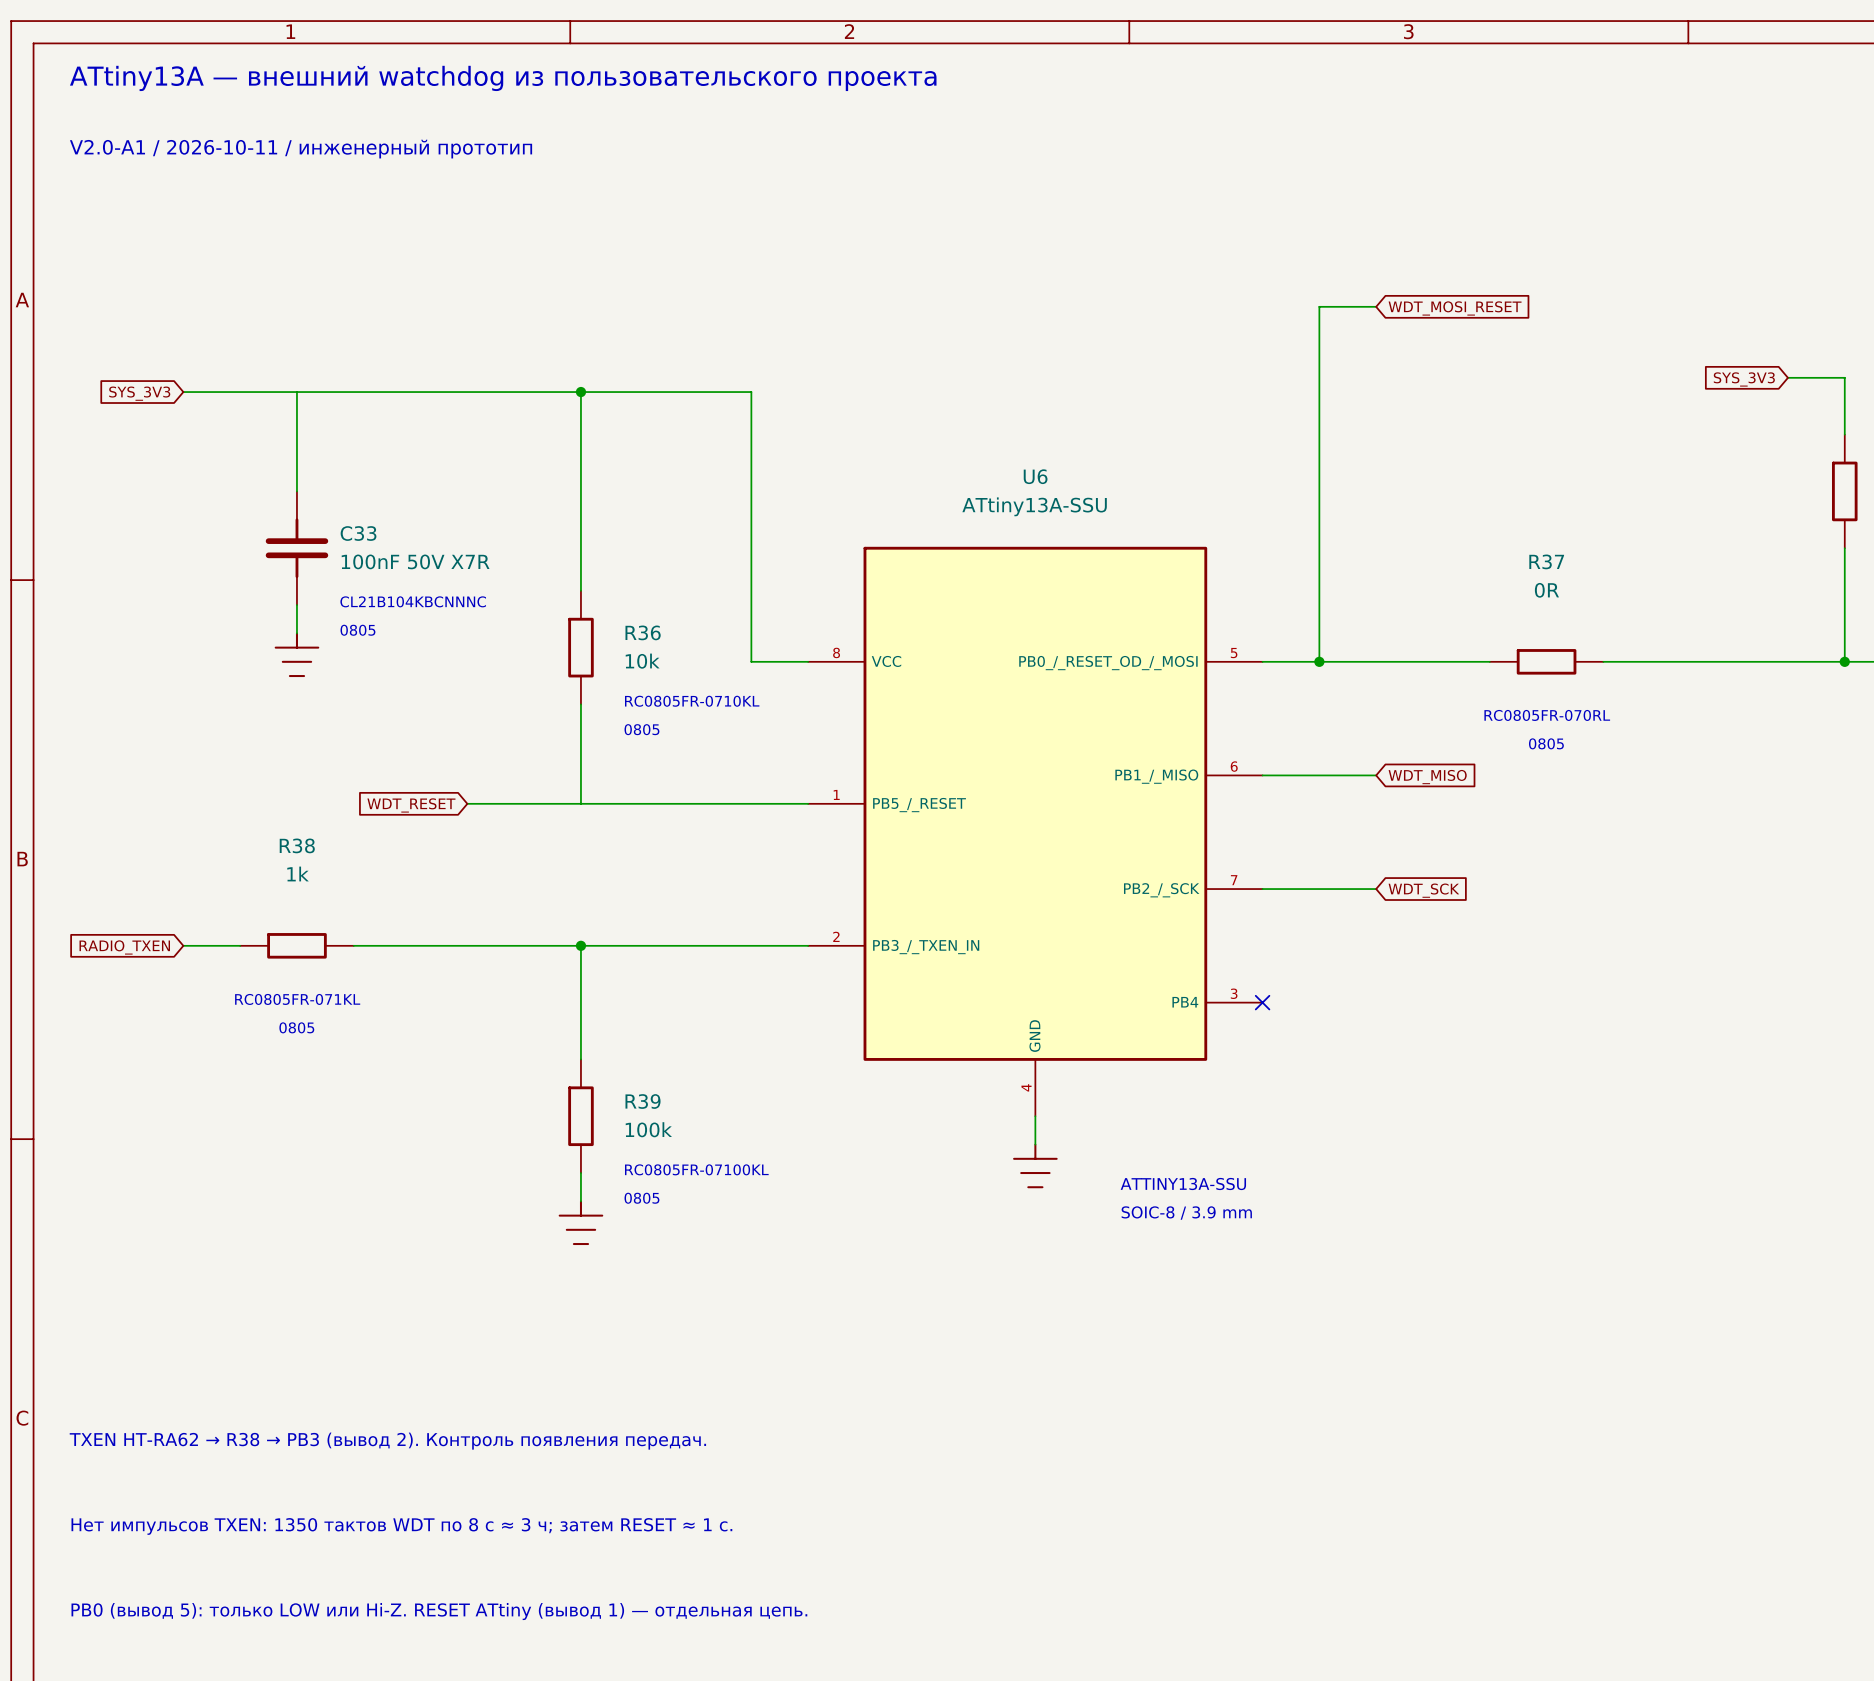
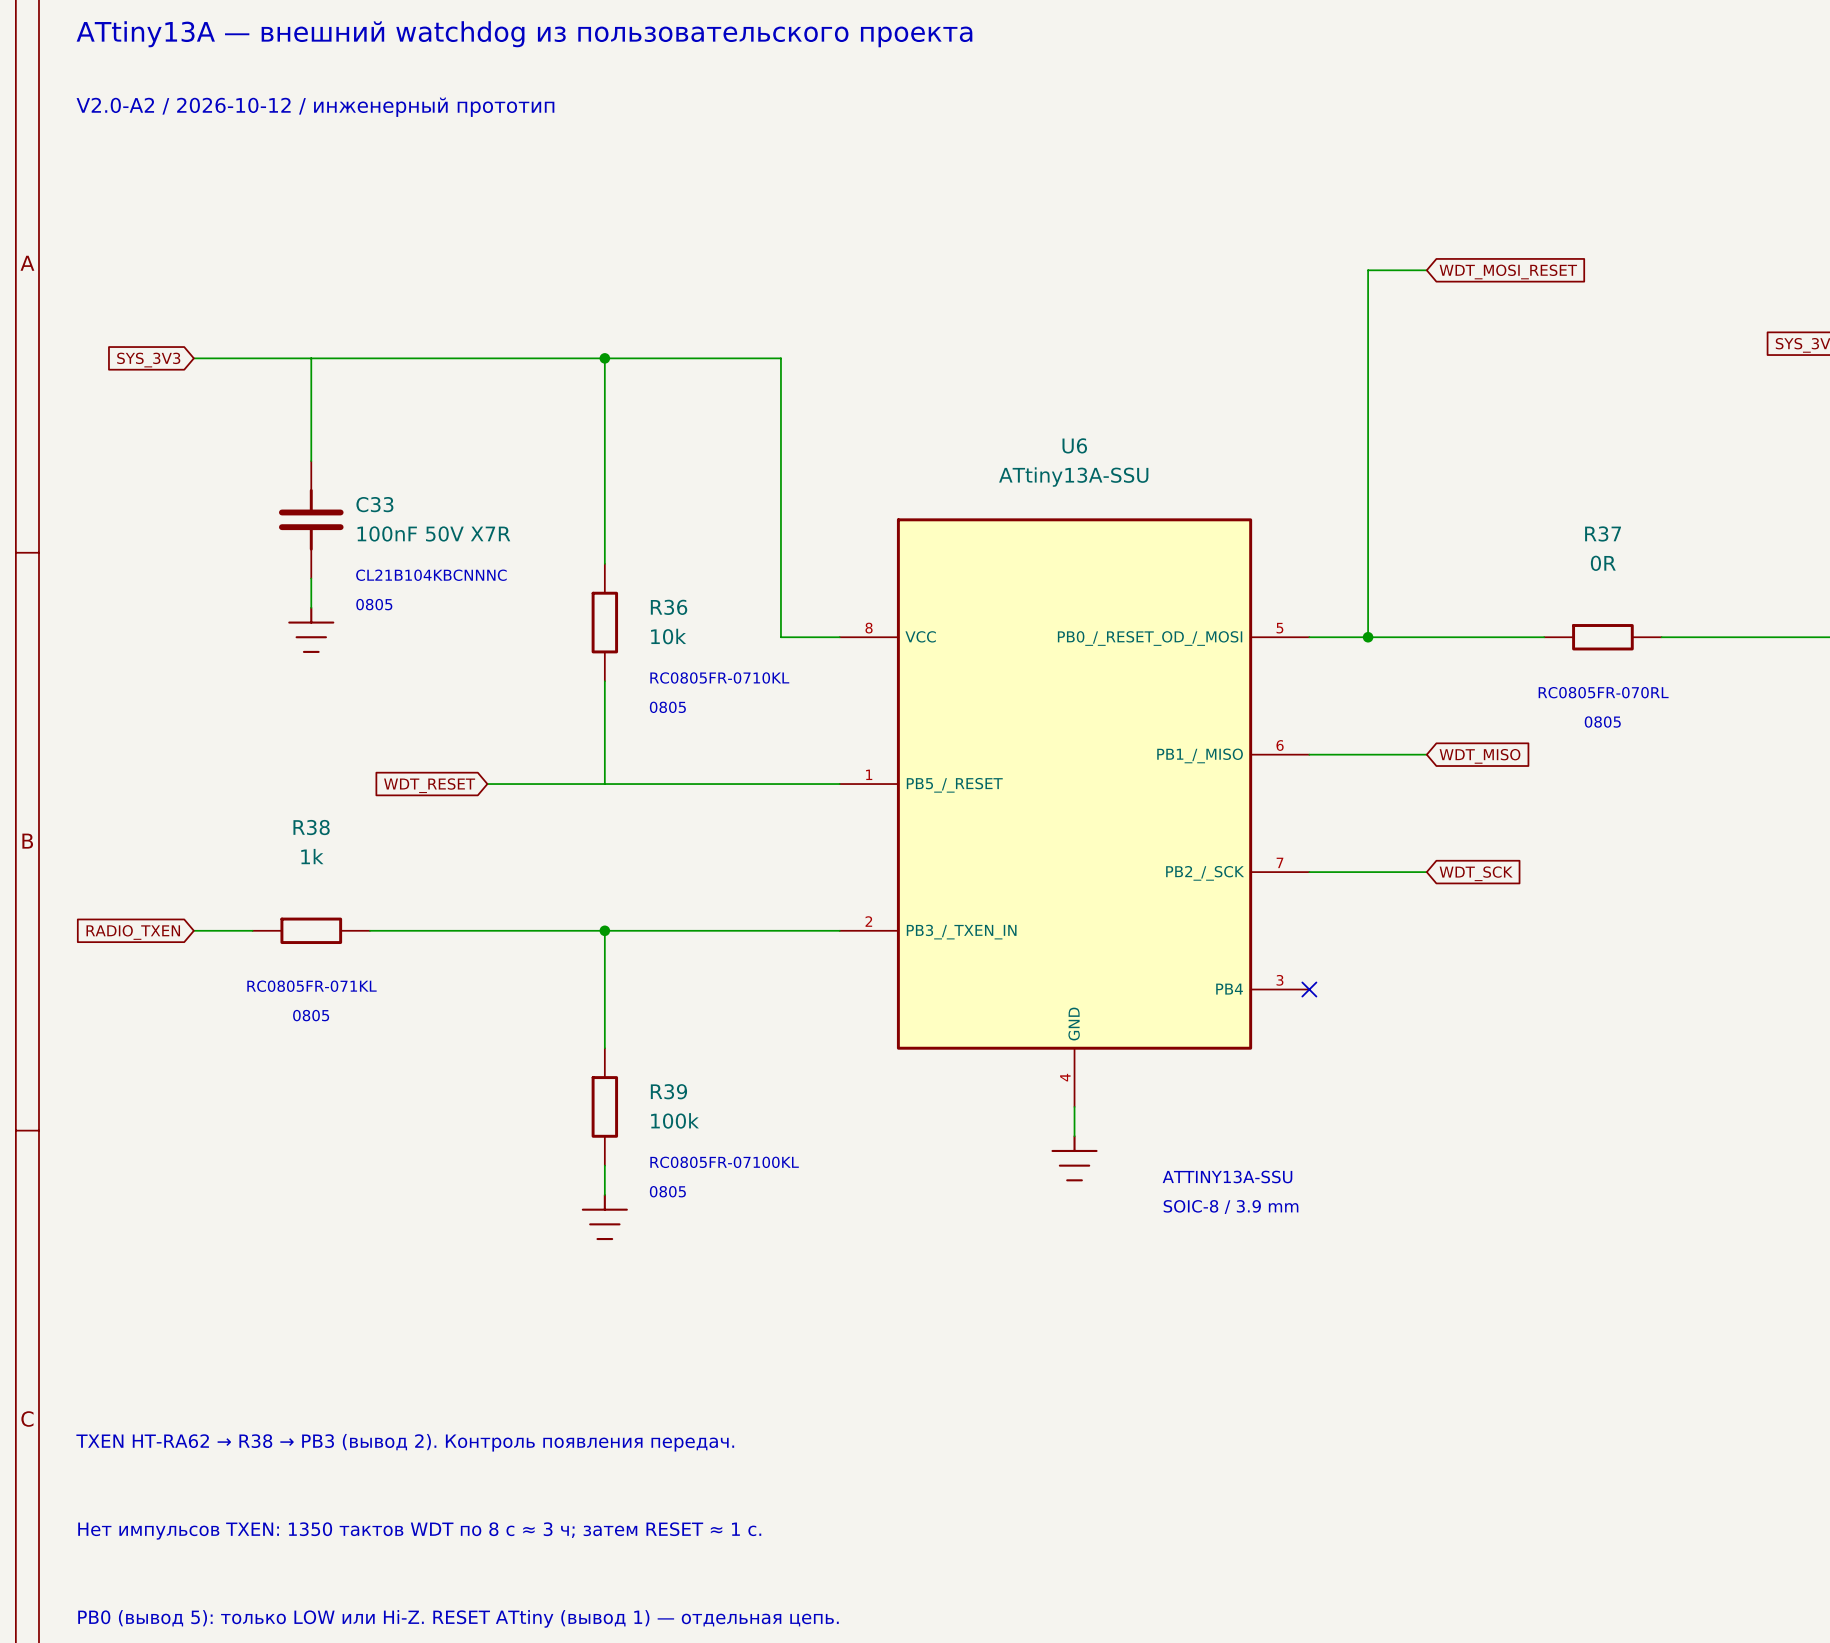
text: V2.0-A1 / 2026-10-11 / инженерный прототип (301, 149) -> V2.0-A2 / 2026-10-12 / инженерный прототип (315, 107)

